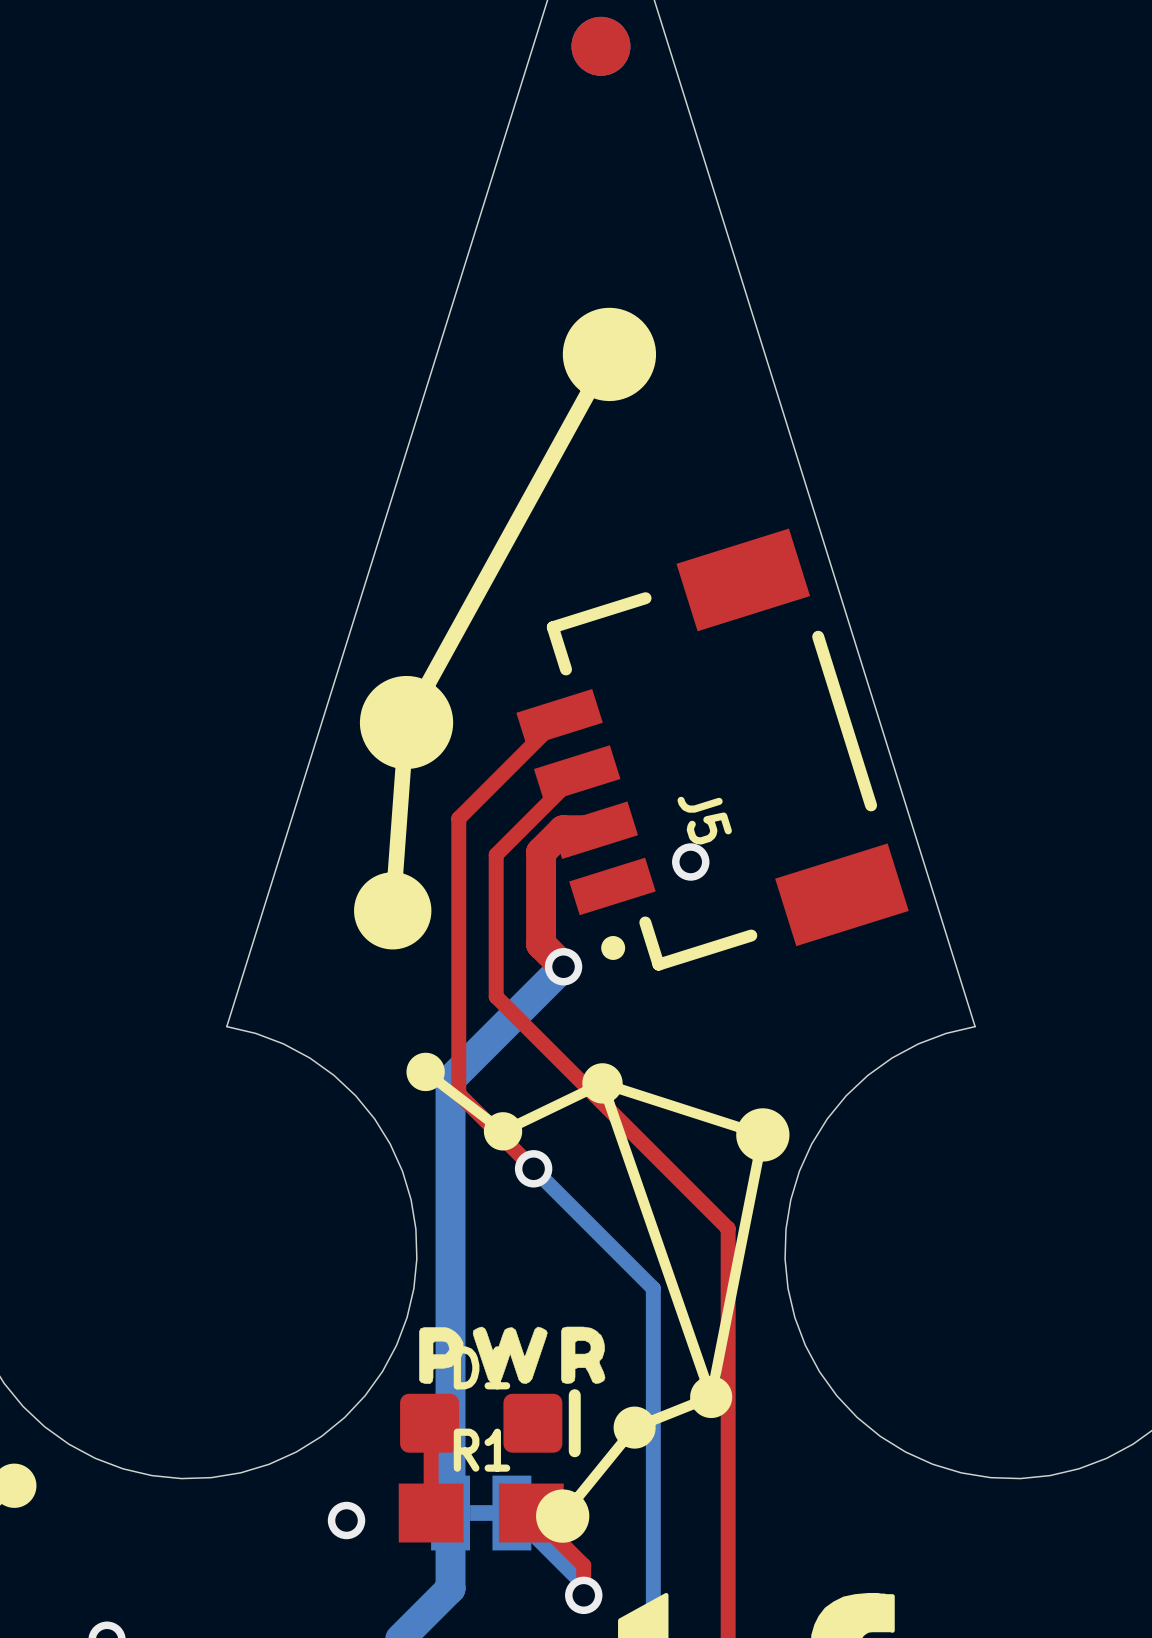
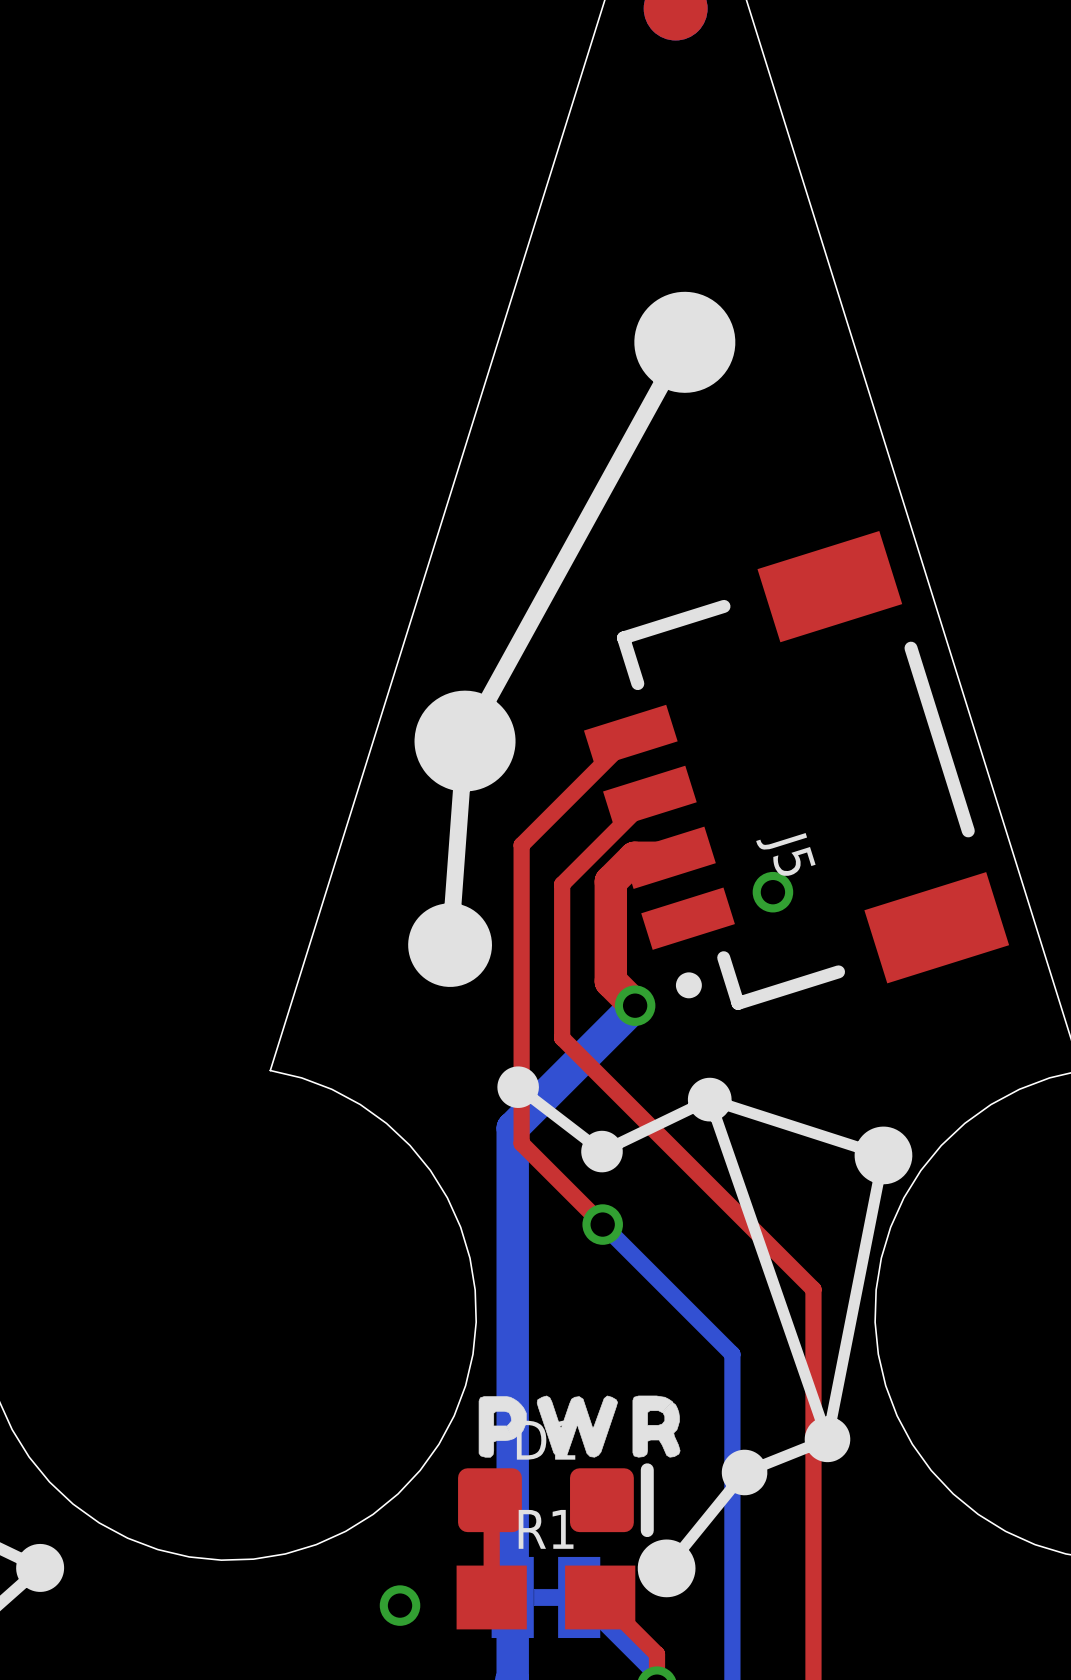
drawing position: (597, 1297) -> (704, 1331)

